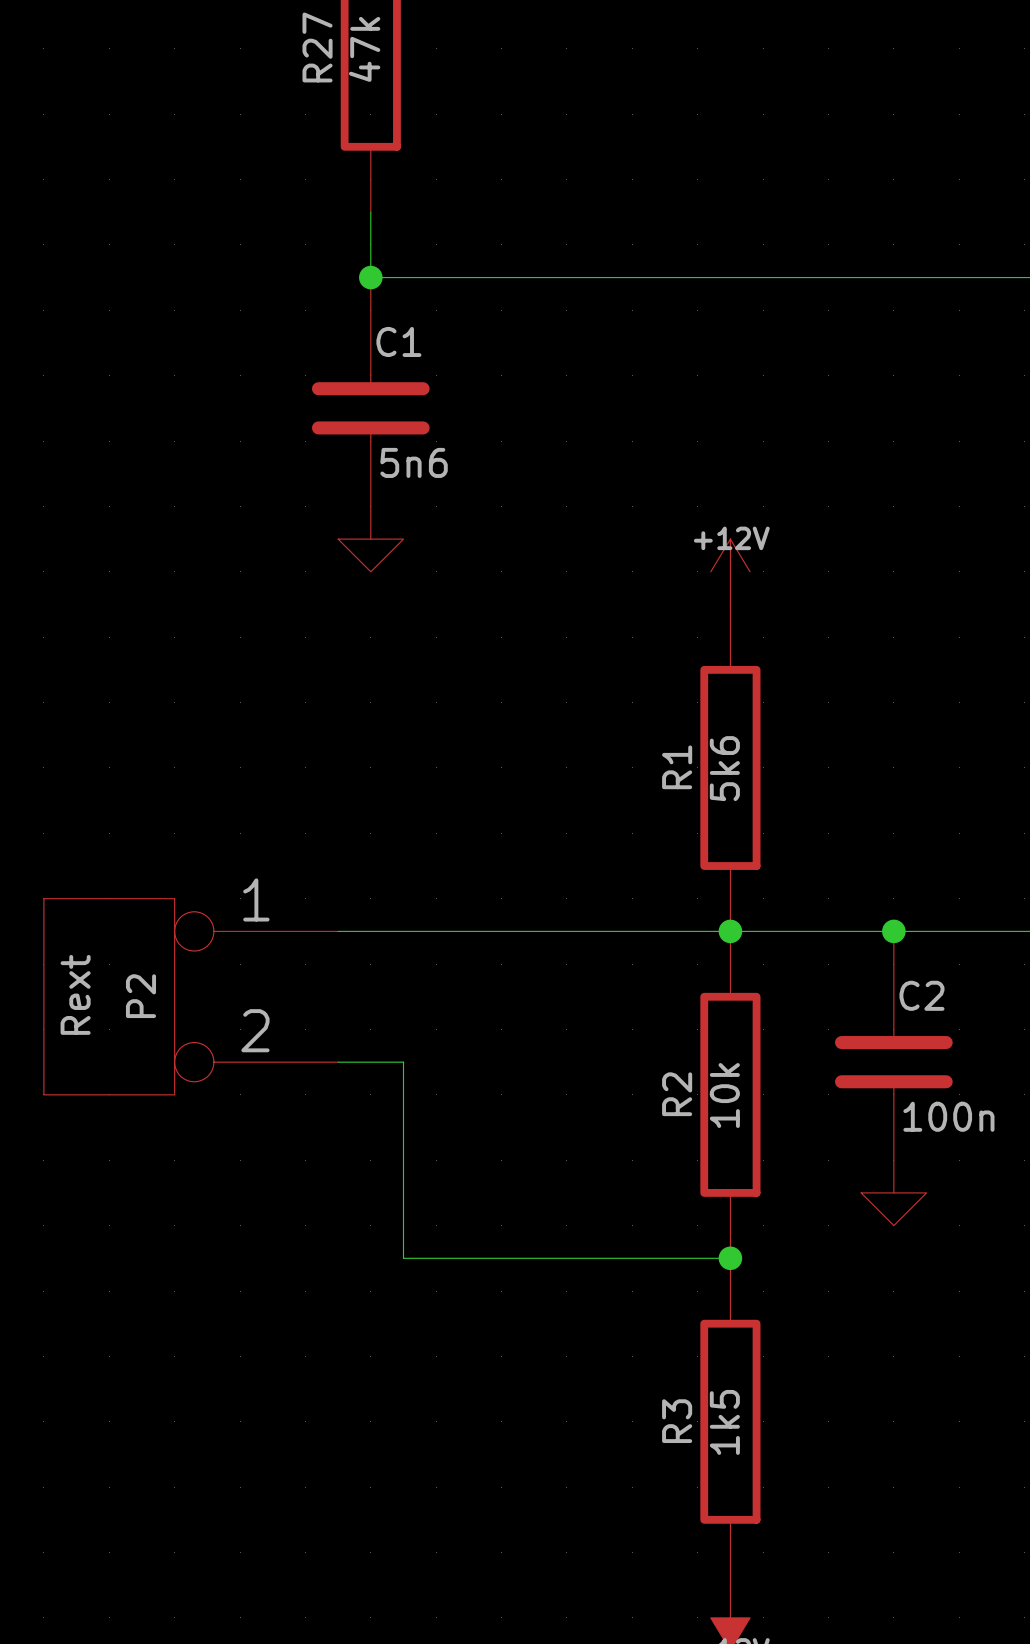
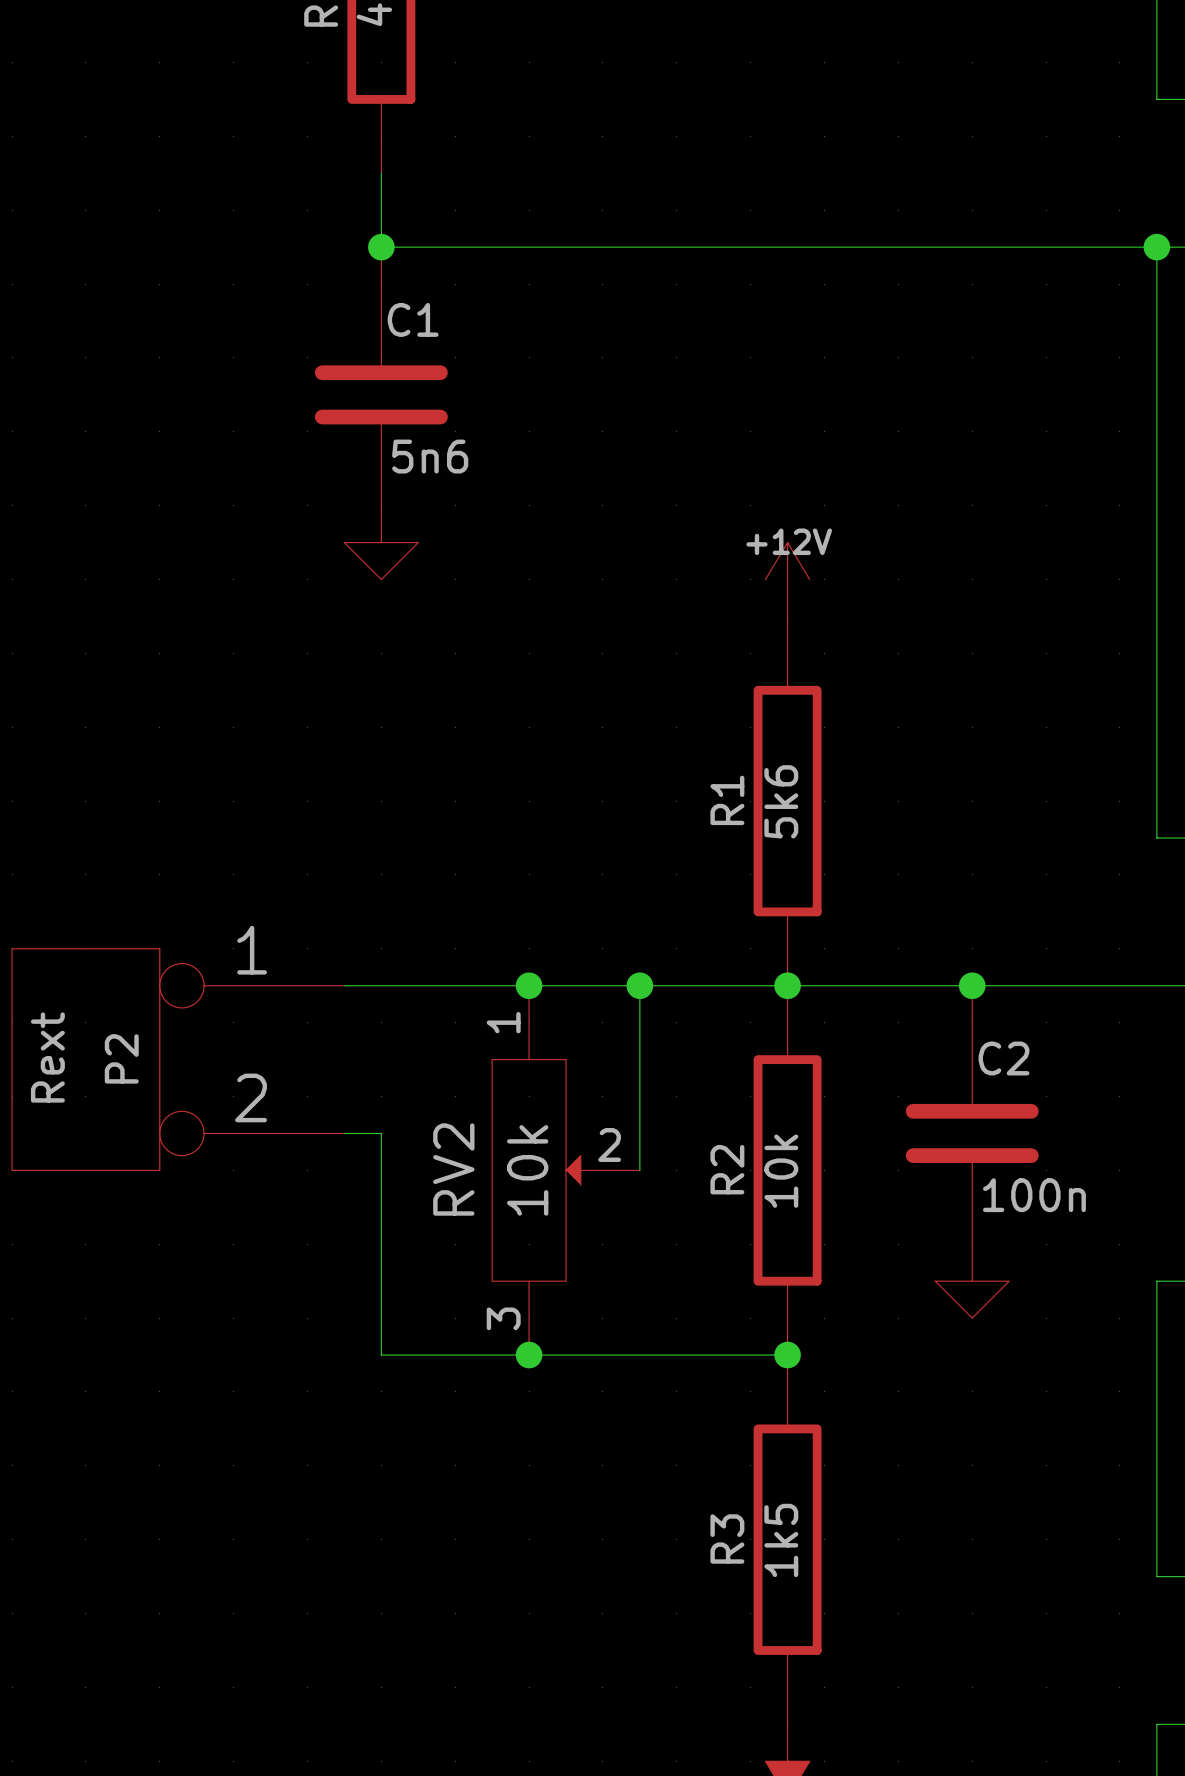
junction: none -> (529, 985)
wire: none -> (639, 985) (639, 1170)
junction: none -> (639, 985)
wire: (370, 1062) (403, 1062) (403, 1258) -> (381, 1133) (381, 1355) (418, 1355)
RV2: none -> 10k (566, 1170)
junction: none -> (529, 1355)

